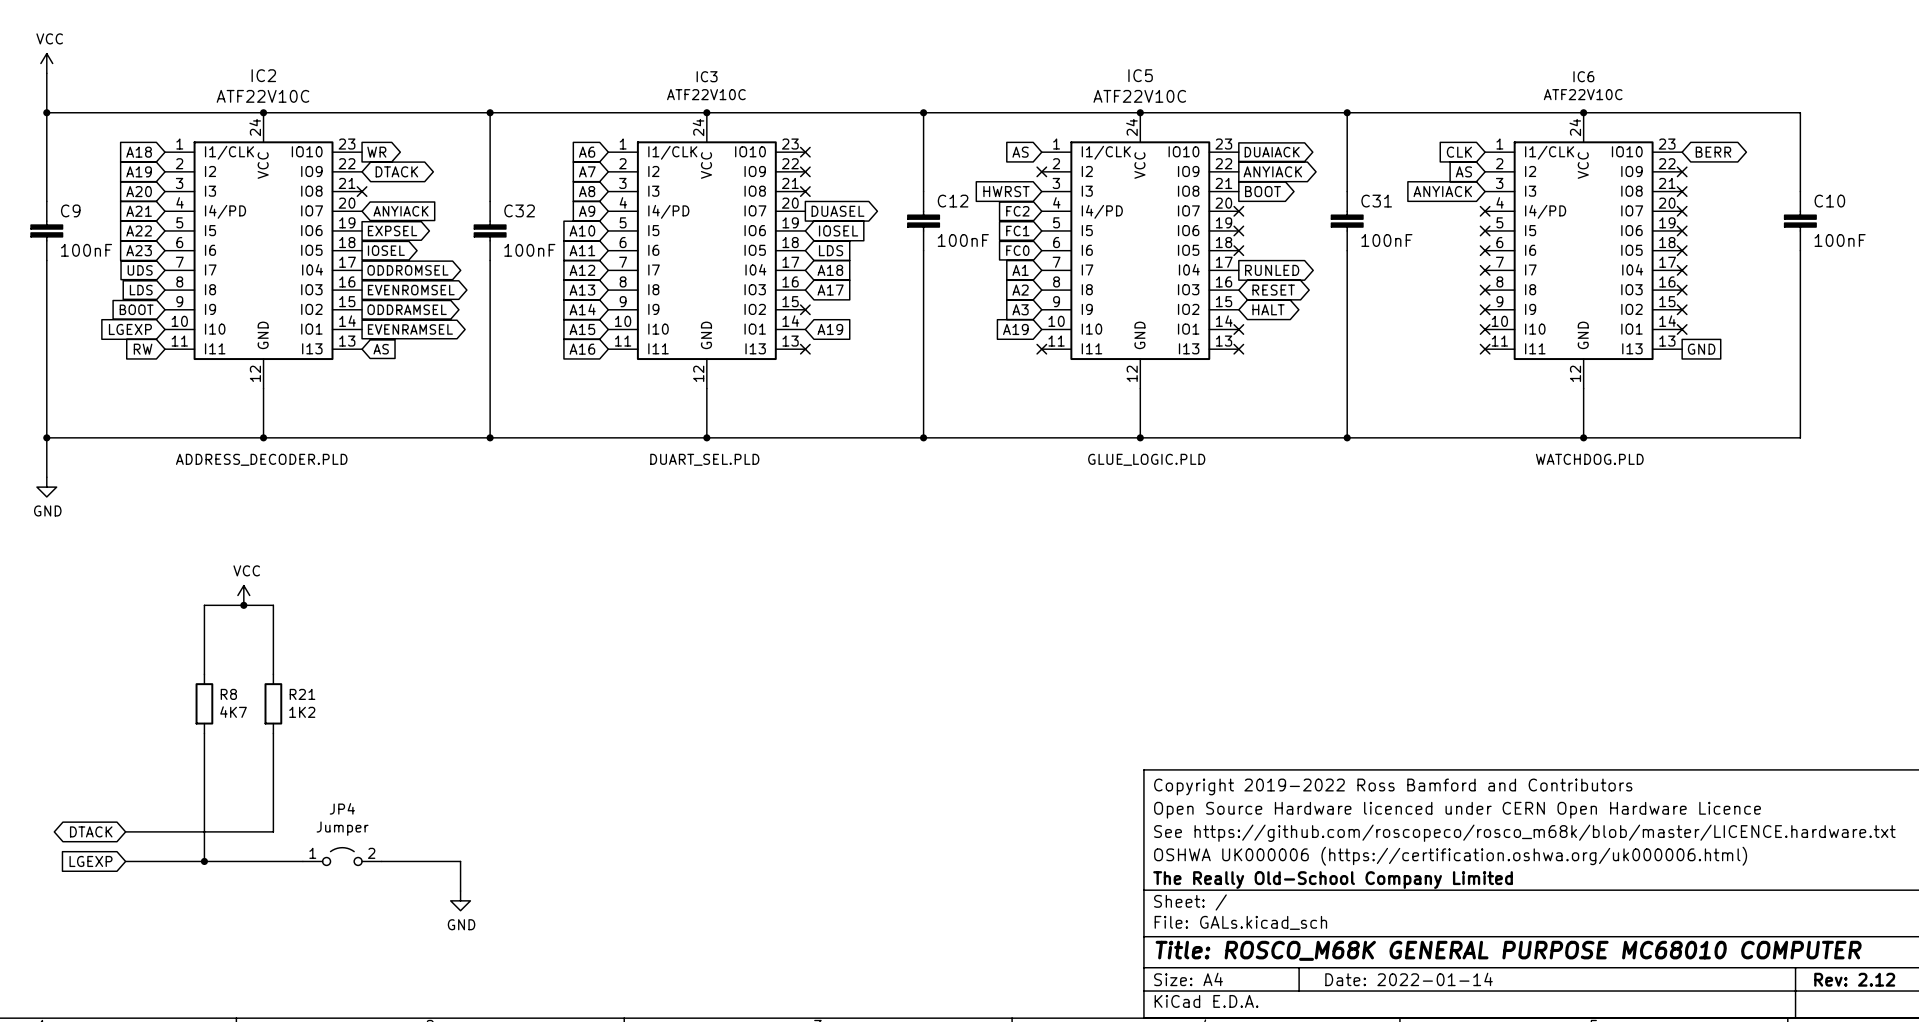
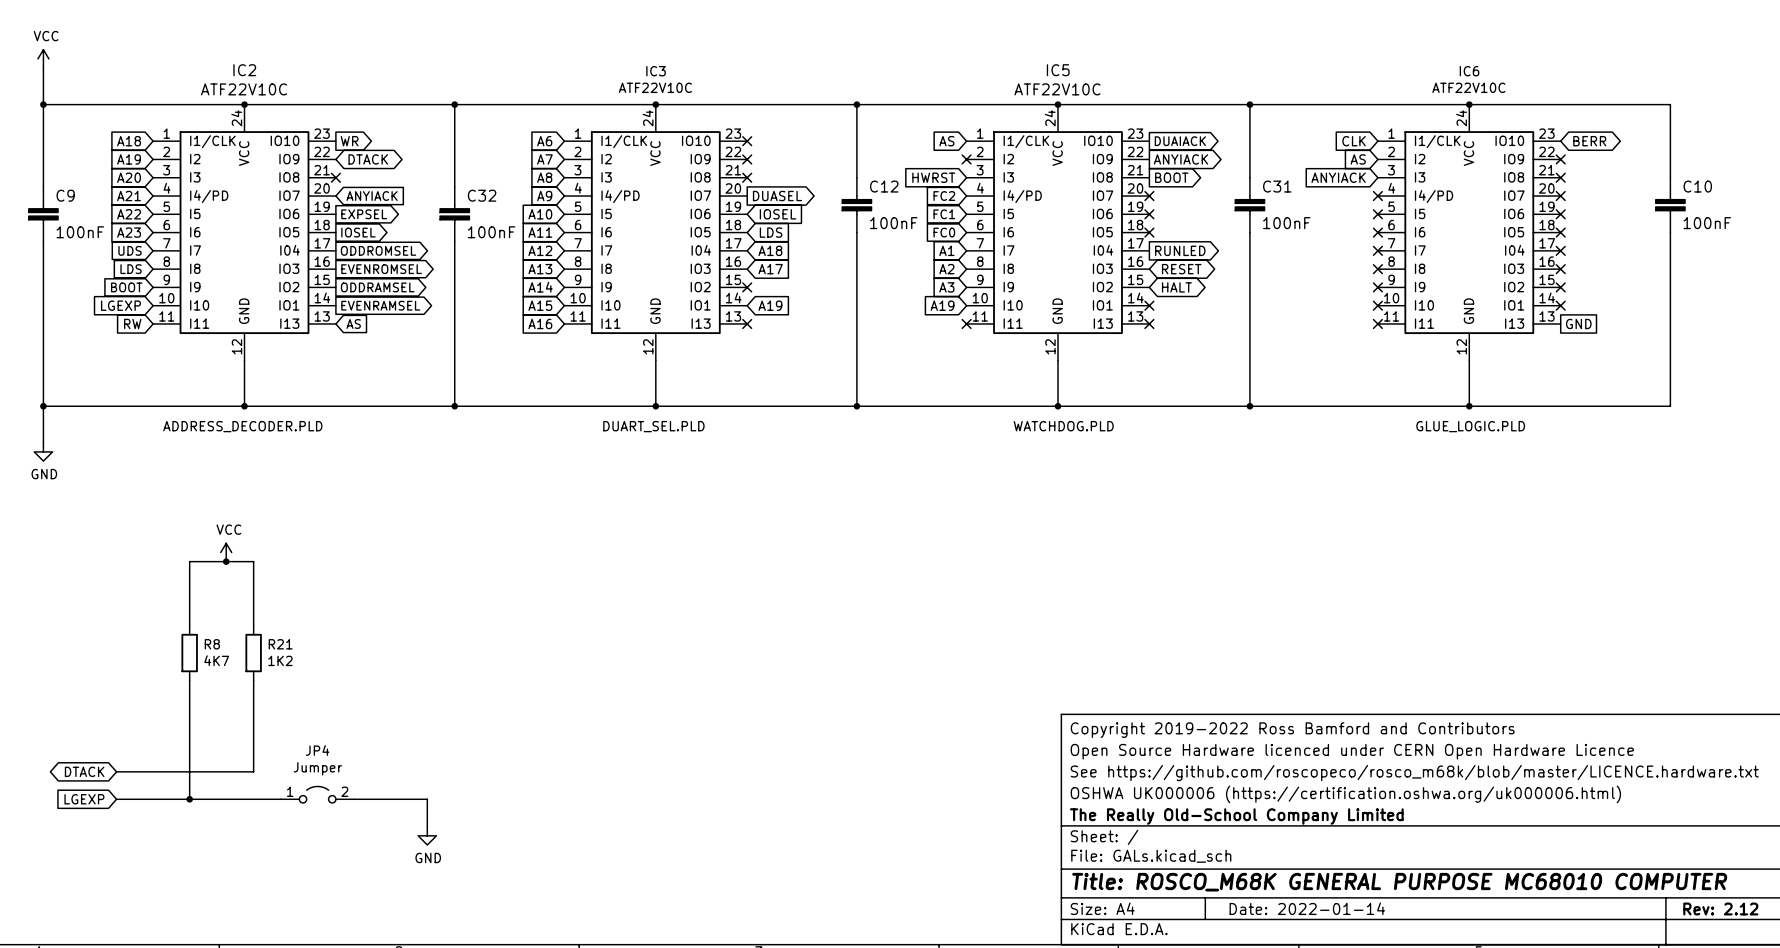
text: GLUE_LOGIC.PLD (1146, 459) -> WATCHDOG.PLD (1063, 426)
text: none -> GLUE_LOGIC.PLD (1470, 426)
text: WATCHDOG.PLD (1589, 459) -> none

